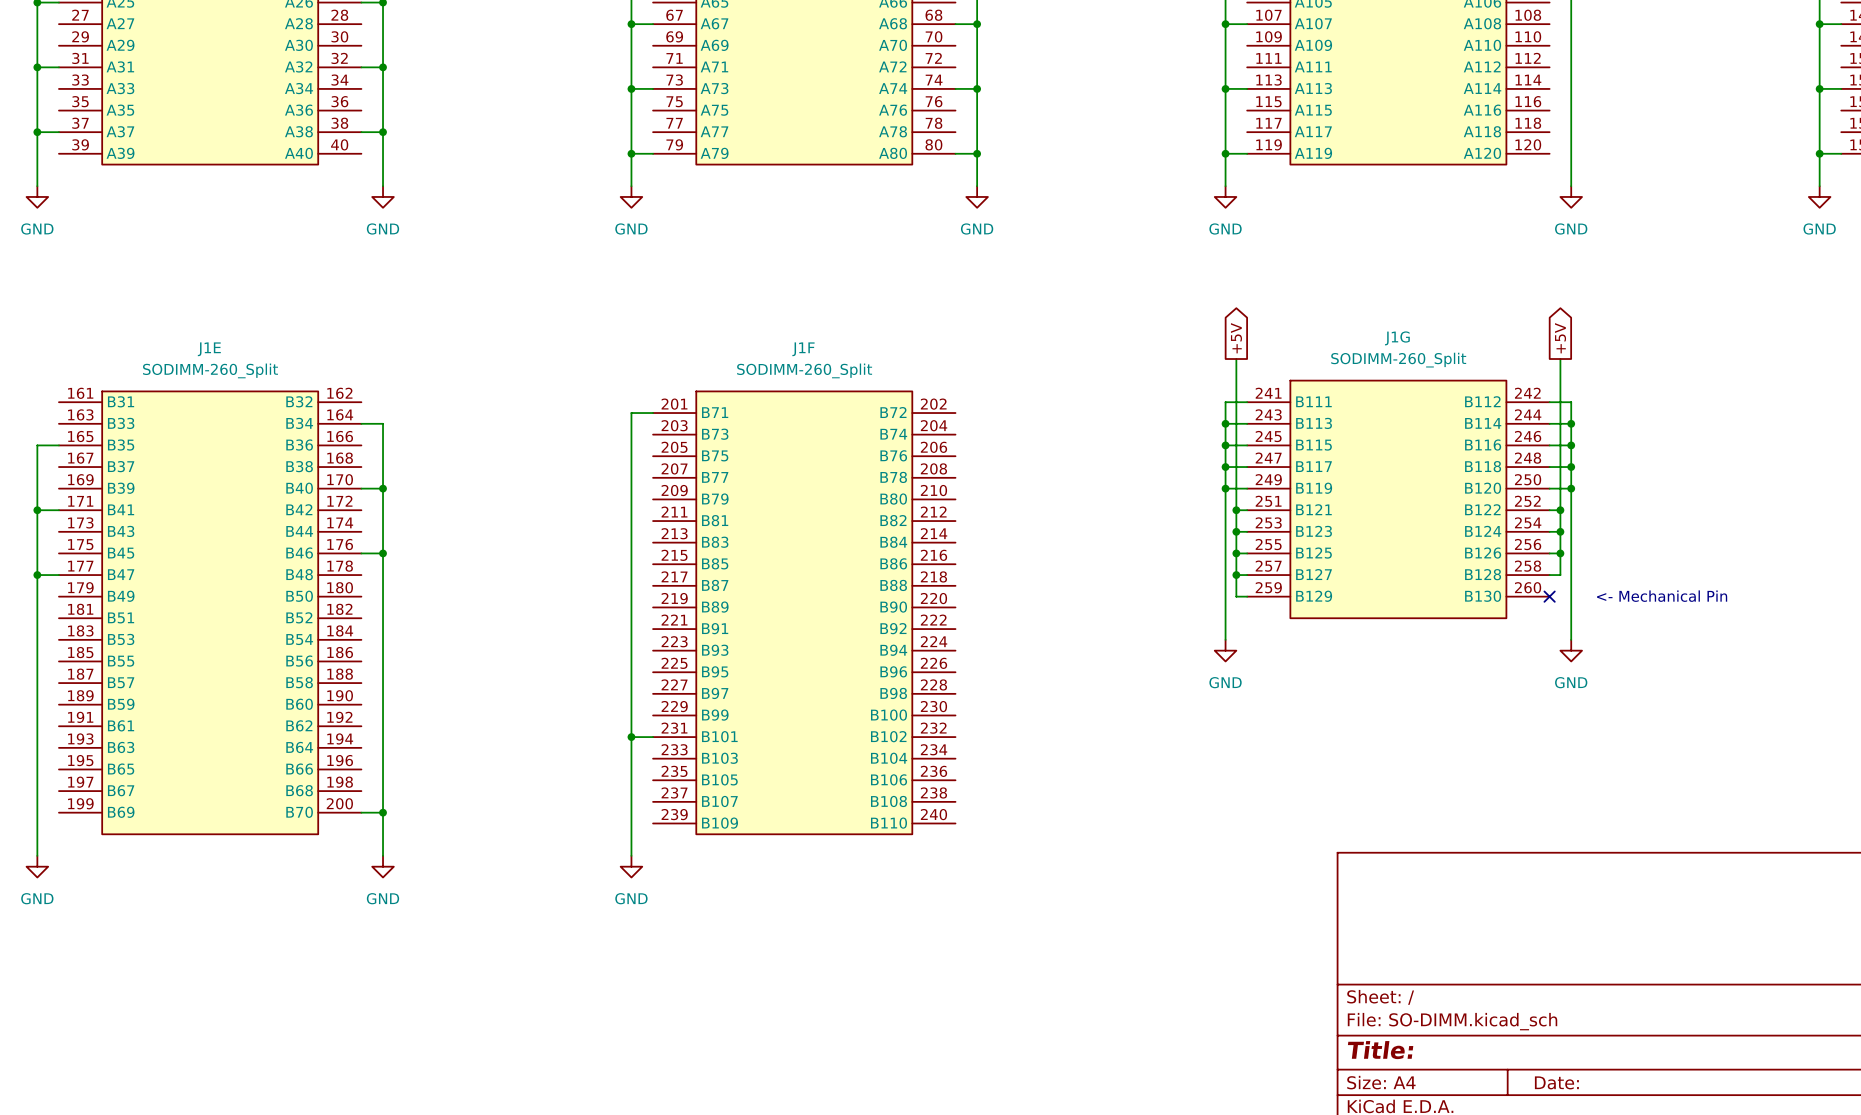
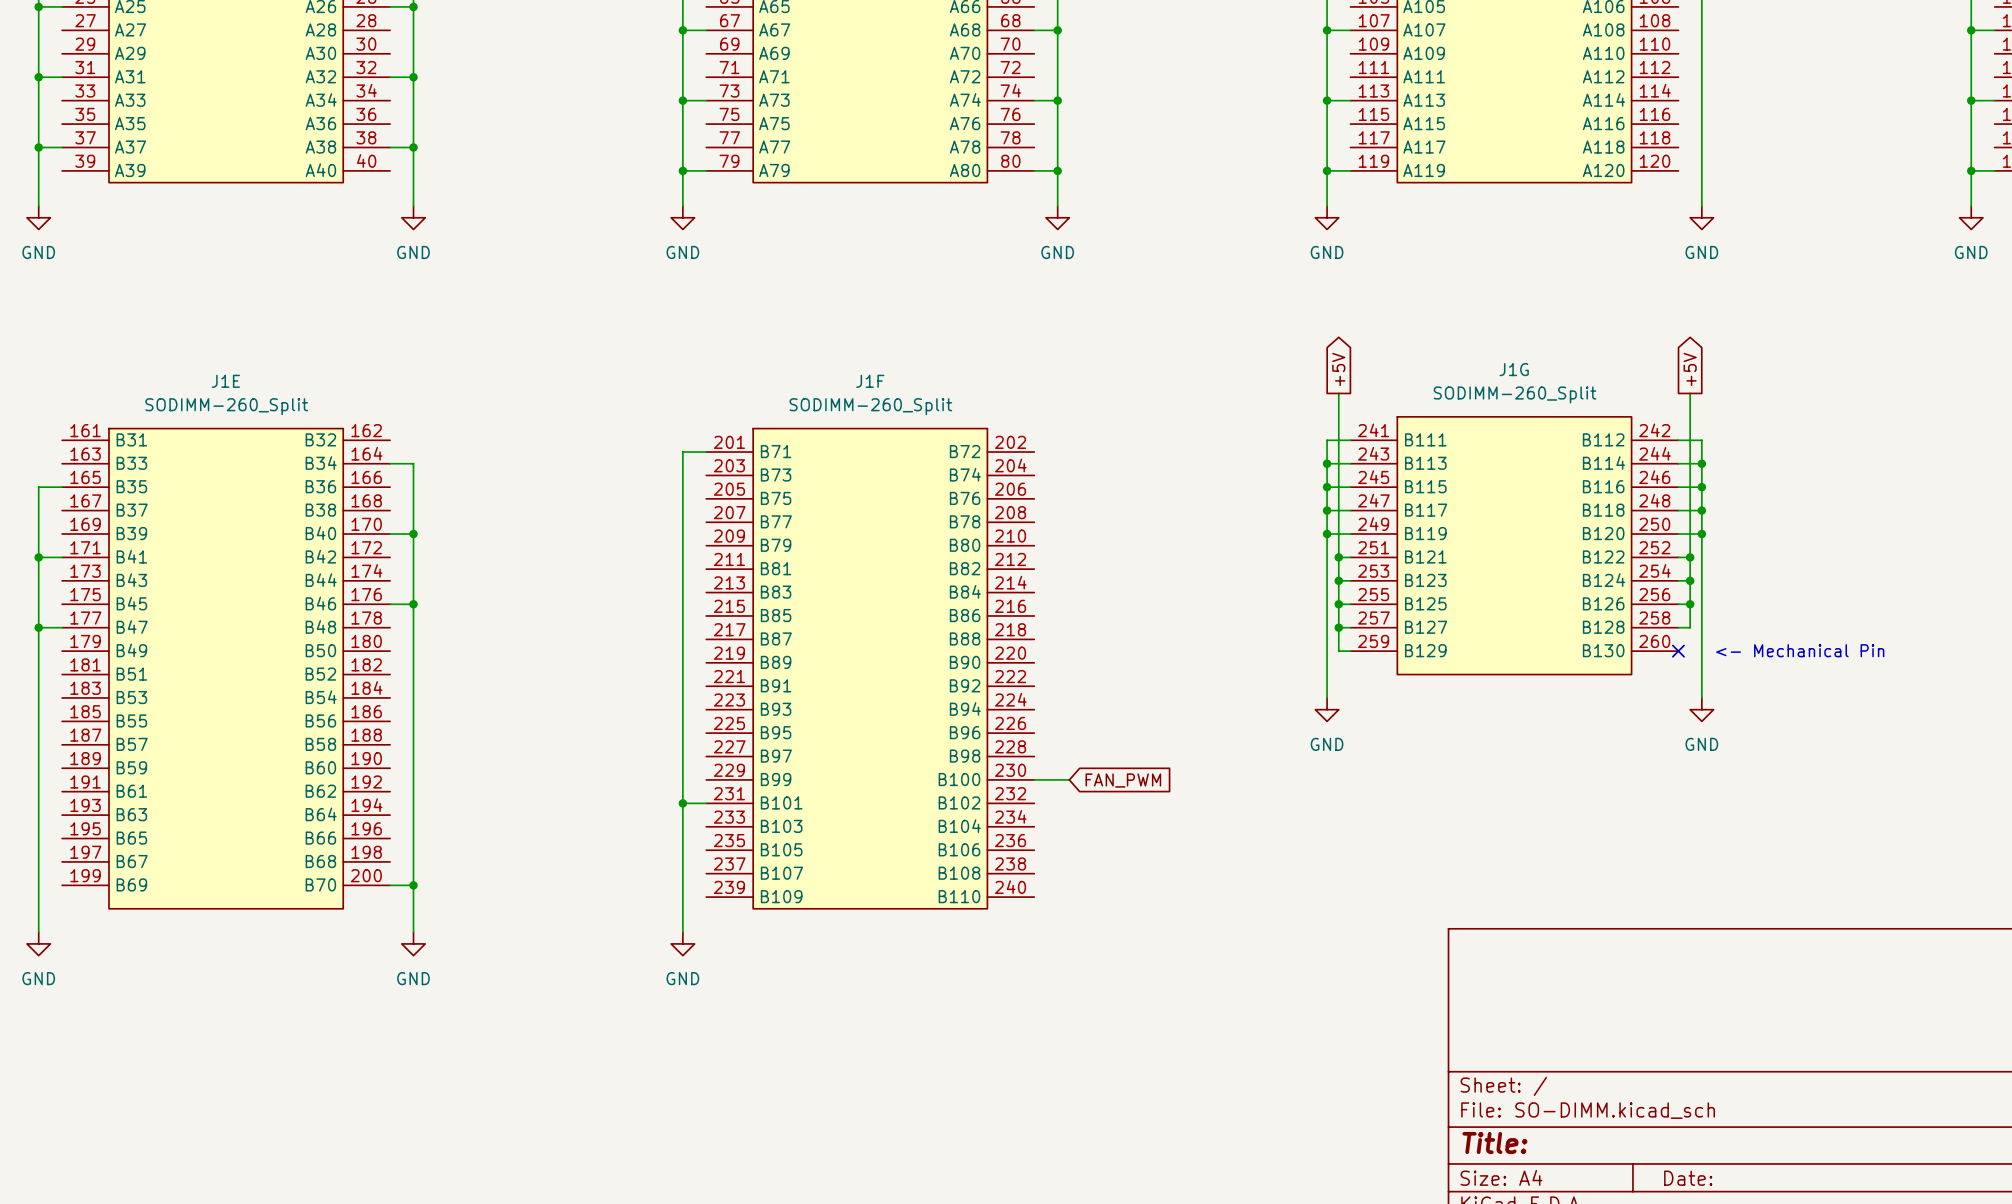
wire: none -> (1034, 779) (1069, 779)
global label: none -> FAN_PWM (1123, 780)

